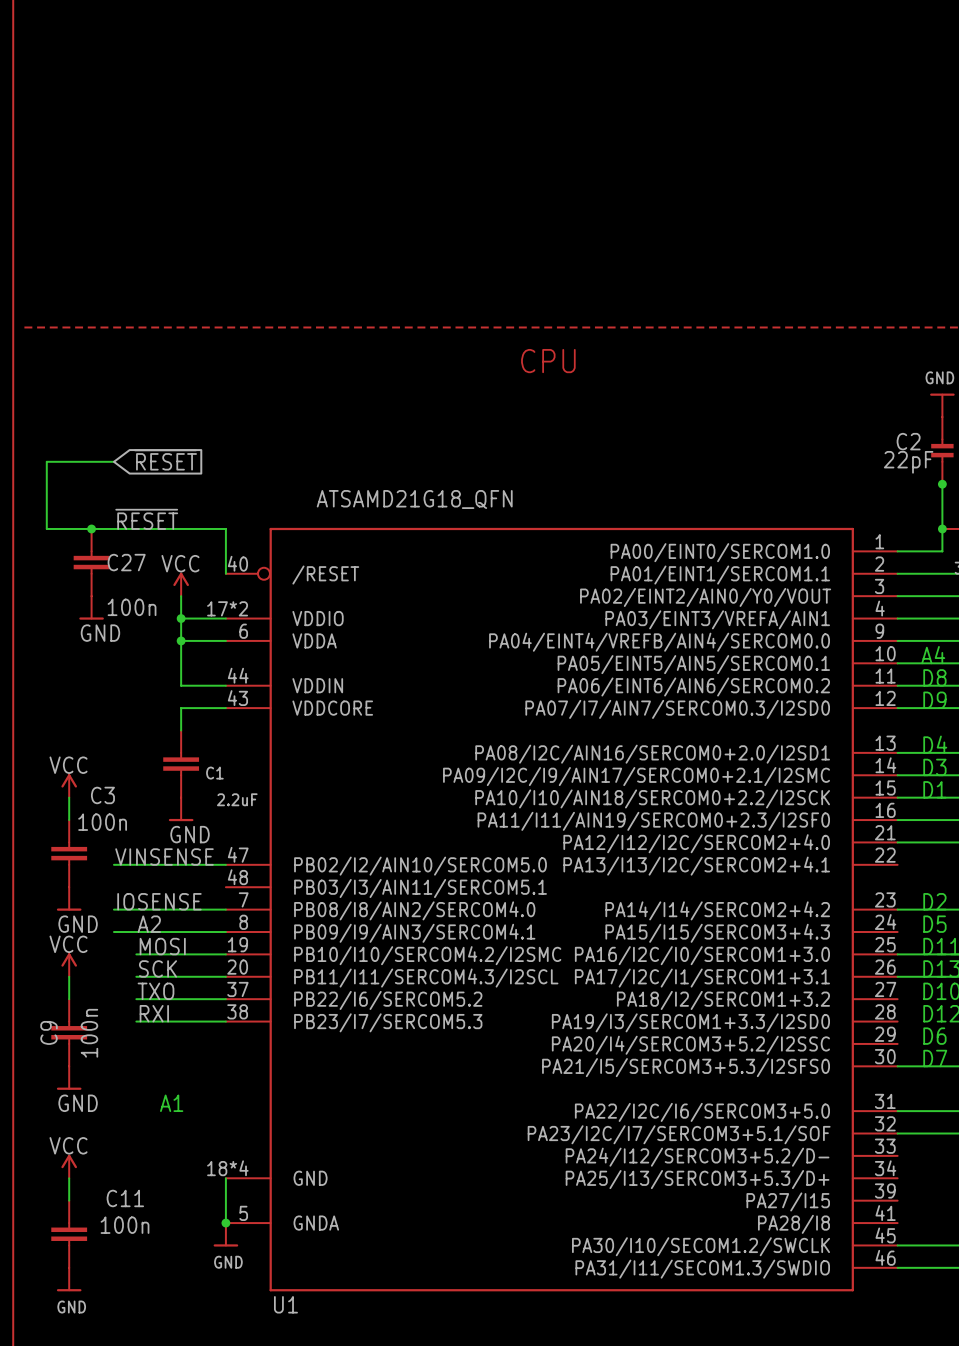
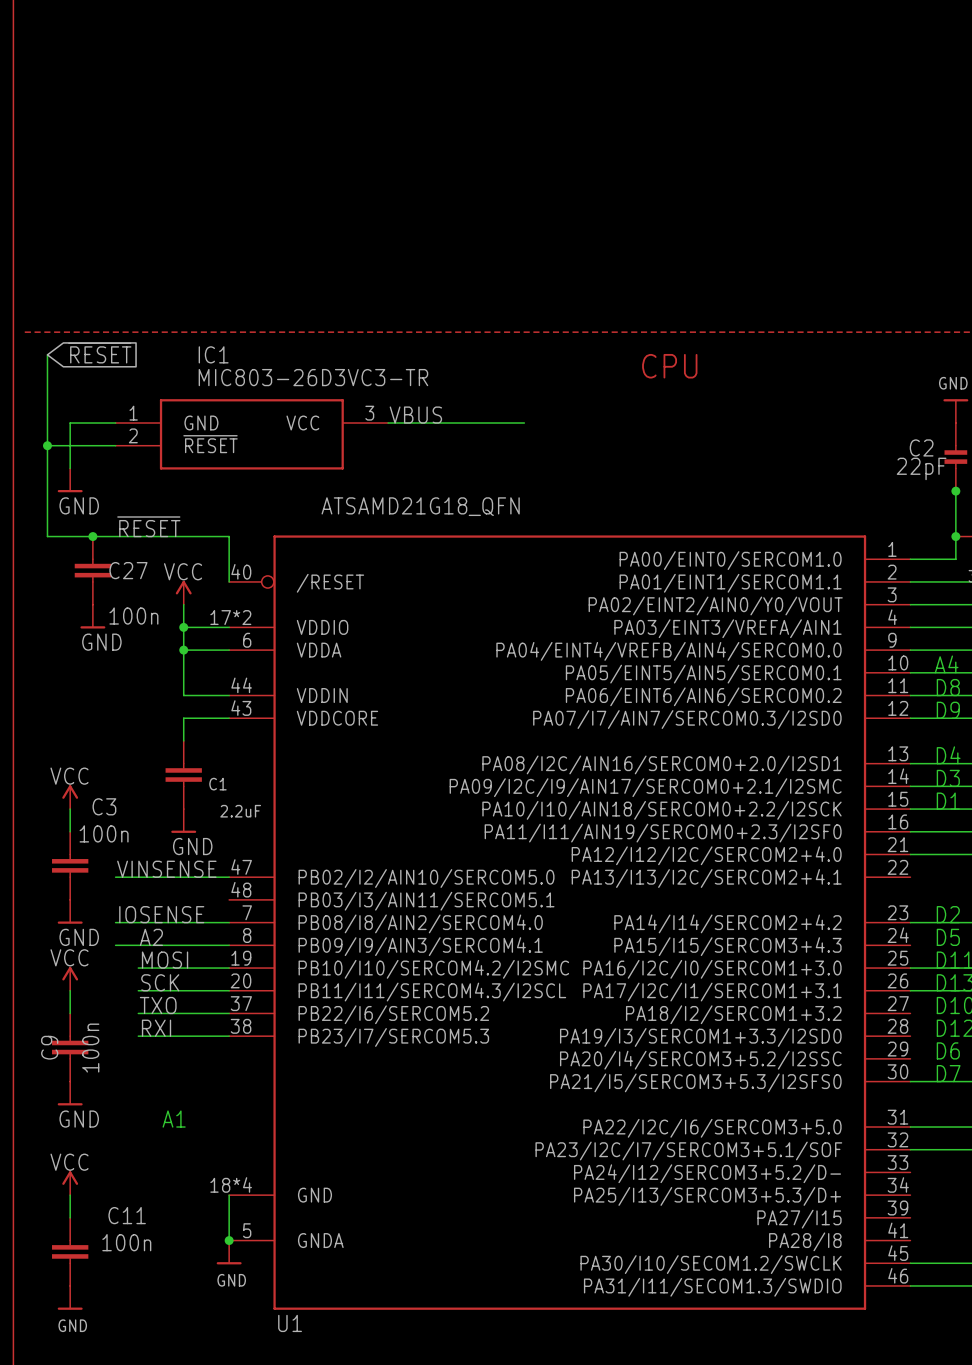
text position: CPU (548, 361) -> CPU (669, 366)
label: none -> VBUS (415, 415)
wire: none -> (115, 423) (70, 423) (70, 468)
wire: none -> (388, 423) (524, 423)
IC1: none -> MIC803-26D3VC3-TR (251, 434)
wire: none -> (47, 445) (115, 445)
junction: none -> (47, 445)
global label position: ~{RESET} (165, 460) -> ~{RESET} (99, 353)
wire: (46, 461) (113, 461) -> (47, 468) (47, 354)
power symbol: none -> GND (70, 480)

